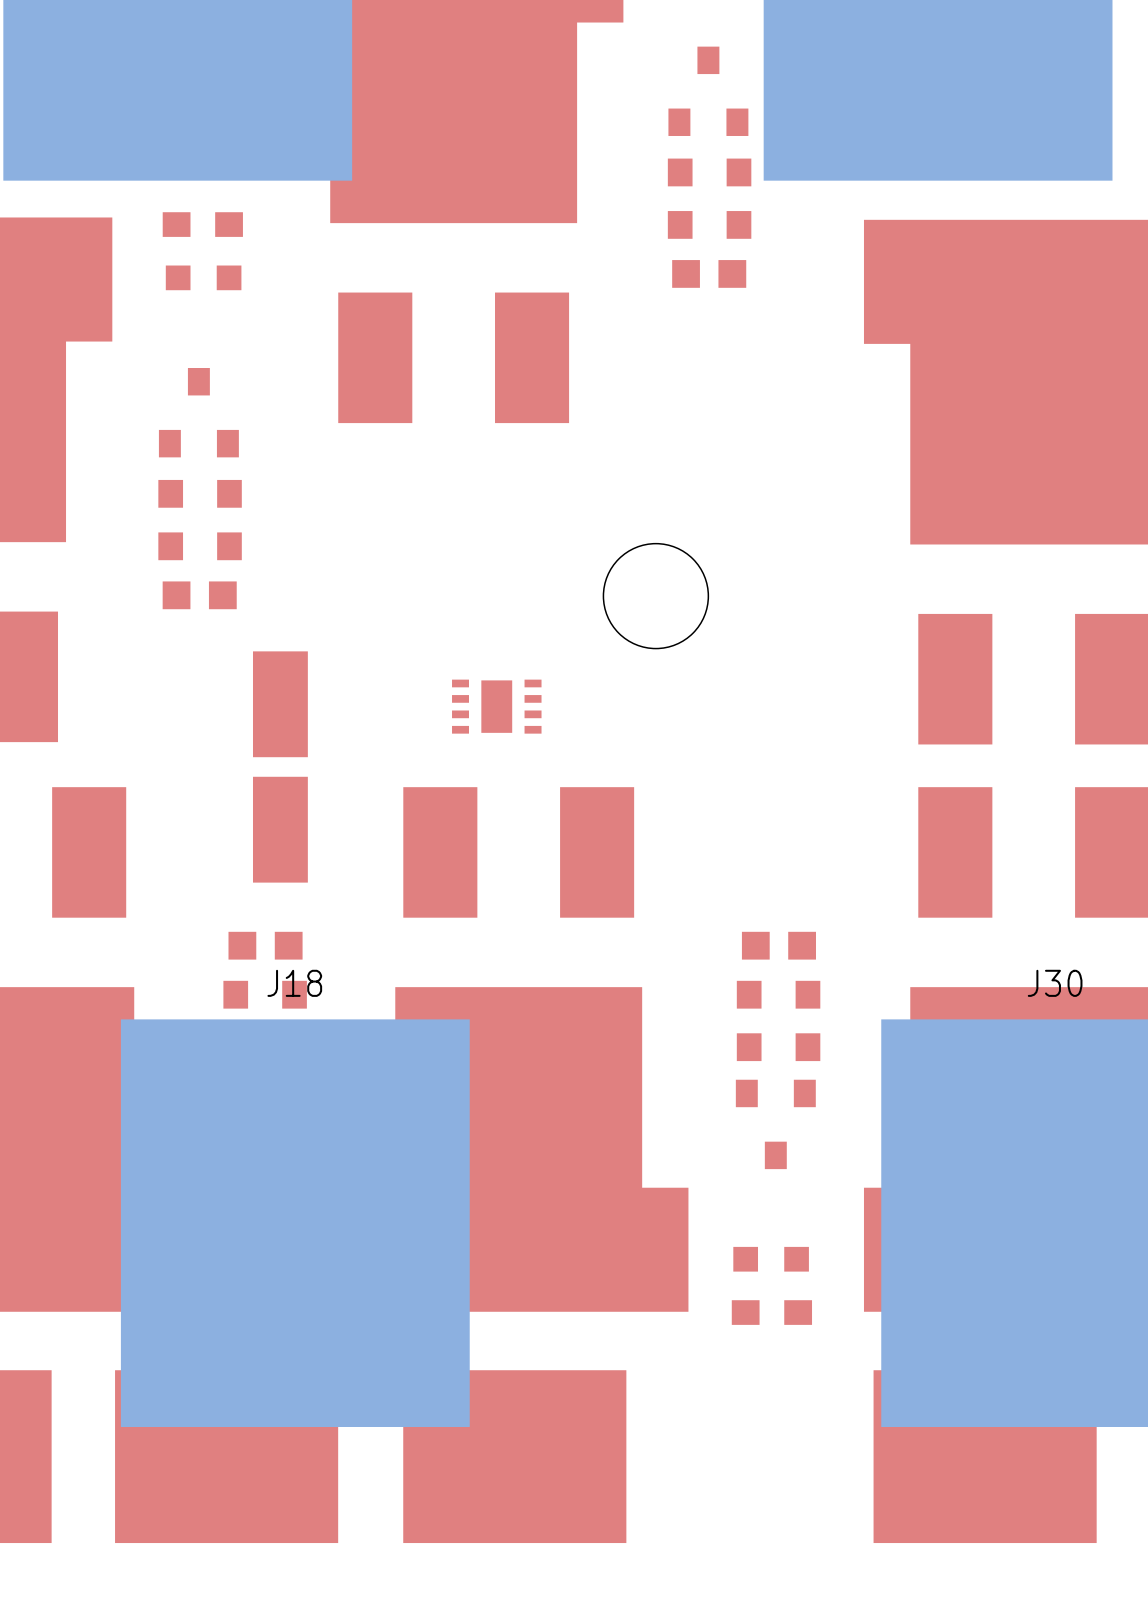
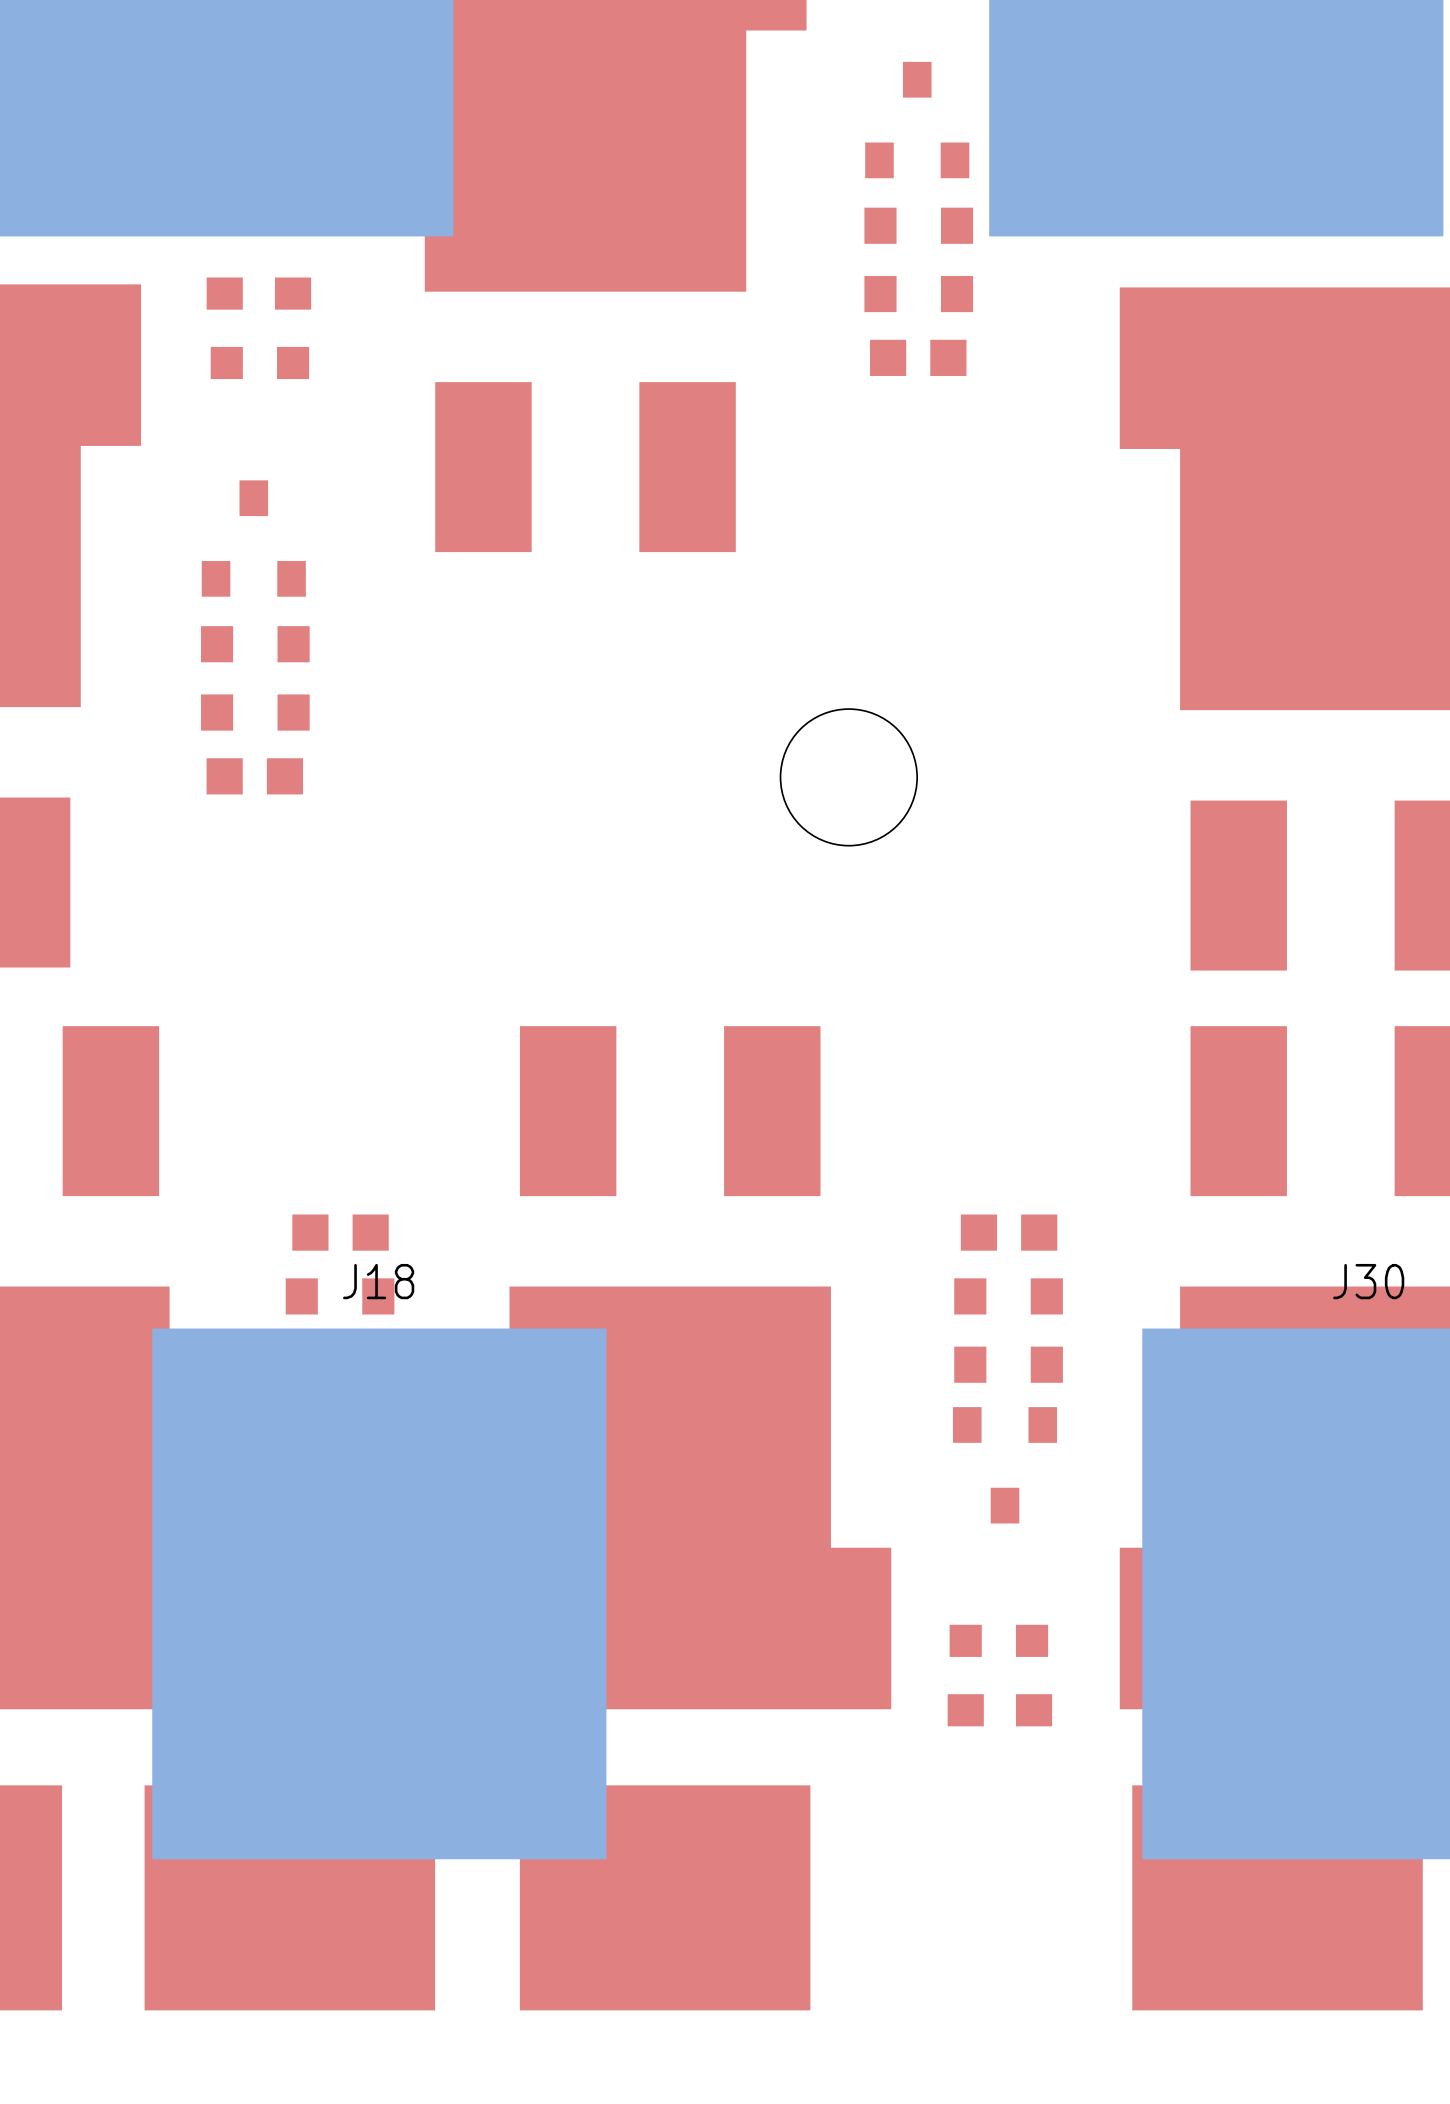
part: (280, 704) -> none
part: (496, 706) -> none
part: (280, 829) -> none

